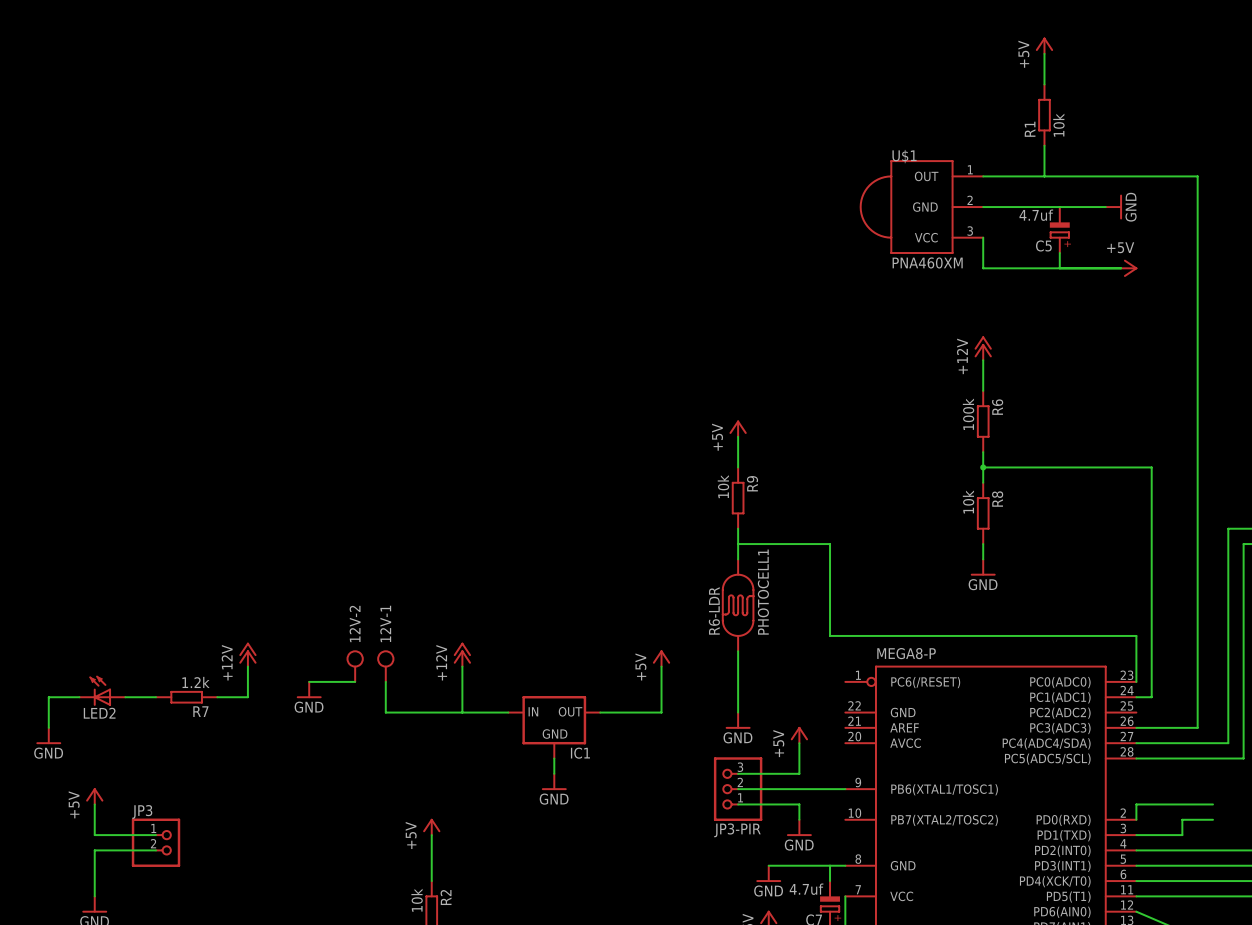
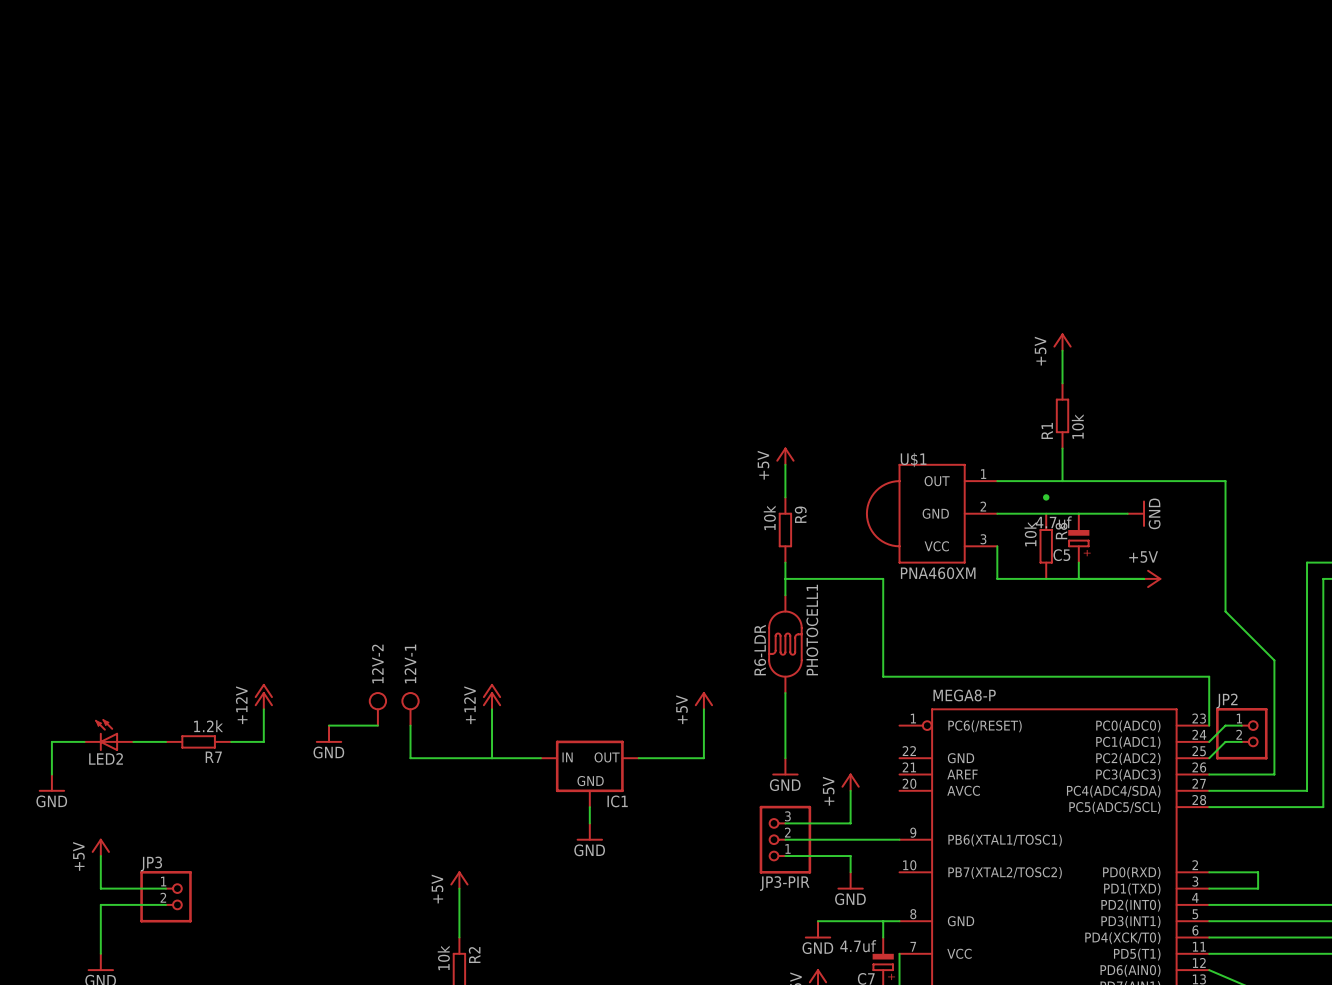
power symbol: +5V (1044, 45) -> none
wire: (1044, 53) (1044, 84) -> none
R1 position: (1044, 115) -> (1062, 415)
wire: (1044, 145) (1044, 176) -> none
wire: (983, 176) (1197, 176) (1197, 620) -> none
U$1 position: (921, 207) -> (931, 513)
wire: (983, 207) (1105, 207) -> none
power symbol: GND (1113, 207) -> none
C5 position: (1059, 230) -> (1078, 538)
wire: (983, 237) (983, 268) (1121, 268) -> none
wire: (1059, 253) (1059, 268) -> none
power symbol: +5V (1129, 268) -> none
power symbol: none -> +5V (1062, 342)
power symbol: +12V (983, 348) -> none
wire: (983, 360) (983, 390) -> (1062, 350) (1062, 383)
R6: 100k (983, 421) -> none
wire: (983, 452) (983, 482) -> (1062, 448) (1062, 481)
wire: (983, 467) (1151, 467) -> (997, 481) (1225, 481) (1225, 497)
wire: none -> (997, 513) (1127, 513)
wire: none -> (997, 546) (997, 578) (1144, 578)
wire: (983, 544) (983, 559) -> (1078, 562) (1078, 578)
power symbol: none -> +5V (1152, 578)
power symbol position: GND (983, 567) -> GND (1136, 513)
power symbol rotation: 0° (983, 574) -> 90° counterclockwise (1144, 513)
wire: (1151, 574) (1151, 697) (1136, 697) -> (1225, 611) (1274, 660)
wire: none -> (1241, 725) (1225, 725) (1209, 741)
JP2: none -> (1241, 733)
wire: none -> (1241, 741) (1225, 741) (1209, 758)
wire: (1212, 804) (1136, 804) (1136, 819) -> (1258, 872) (1209, 872)
wire: (1182, 819) (1212, 819) -> none

